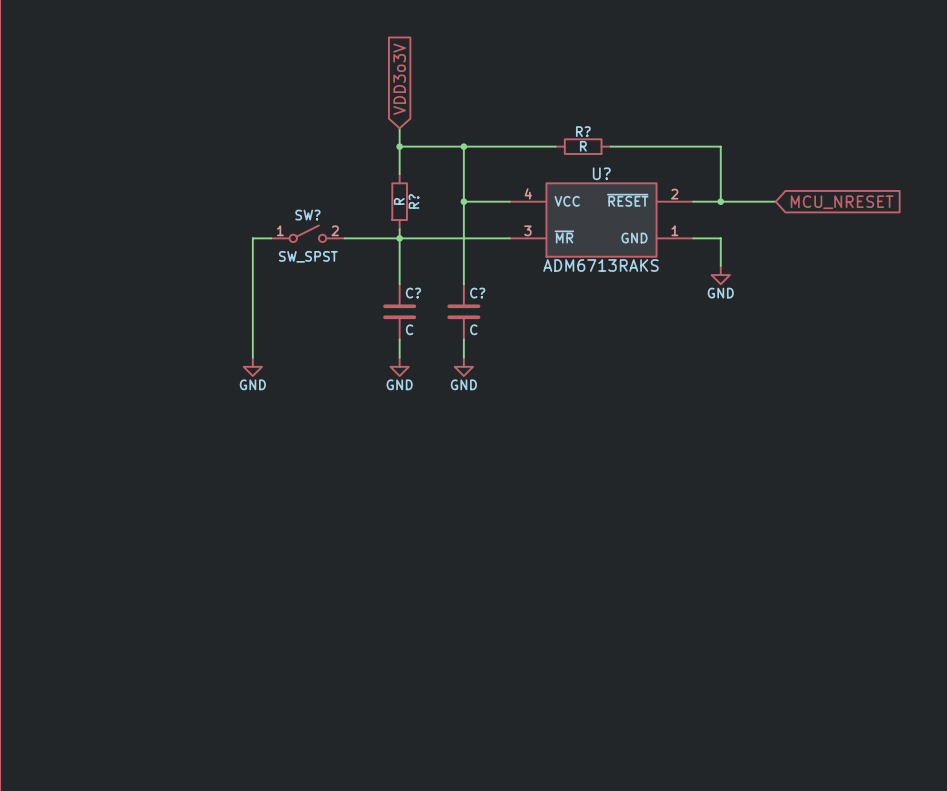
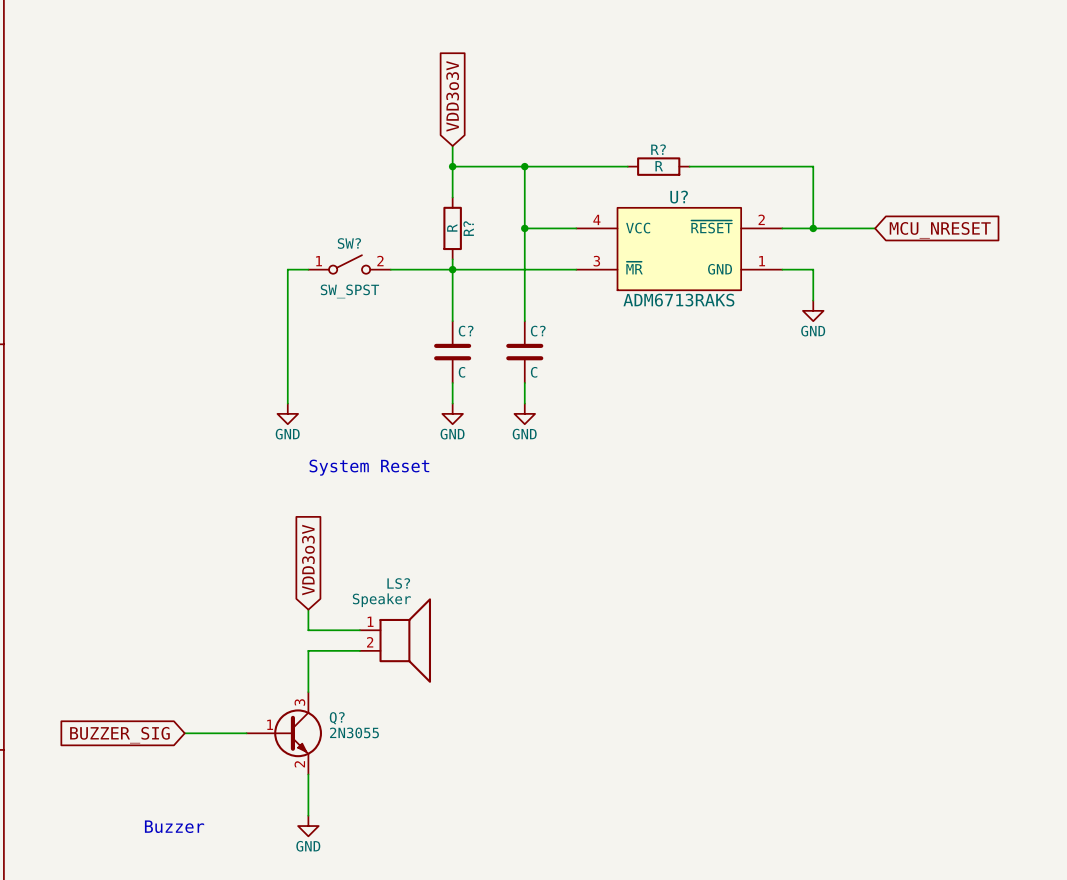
text: none -> System Reset (369, 467)
global label: none -> VDD3o3V (308, 560)
wire: none -> (308, 609) (308, 630) (359, 630)
LS?: none -> Speaker (395, 640)
wire: none -> (359, 650) (308, 650) (308, 692)
global label: none -> BUZZER_SIG (119, 735)
wire: none -> (184, 733) (246, 733)
Q?: none -> 2N3055 (284, 733)
wire: none -> (308, 774) (308, 815)
power symbol: none -> GND (308, 826)
text: none -> Buzzer (174, 826)

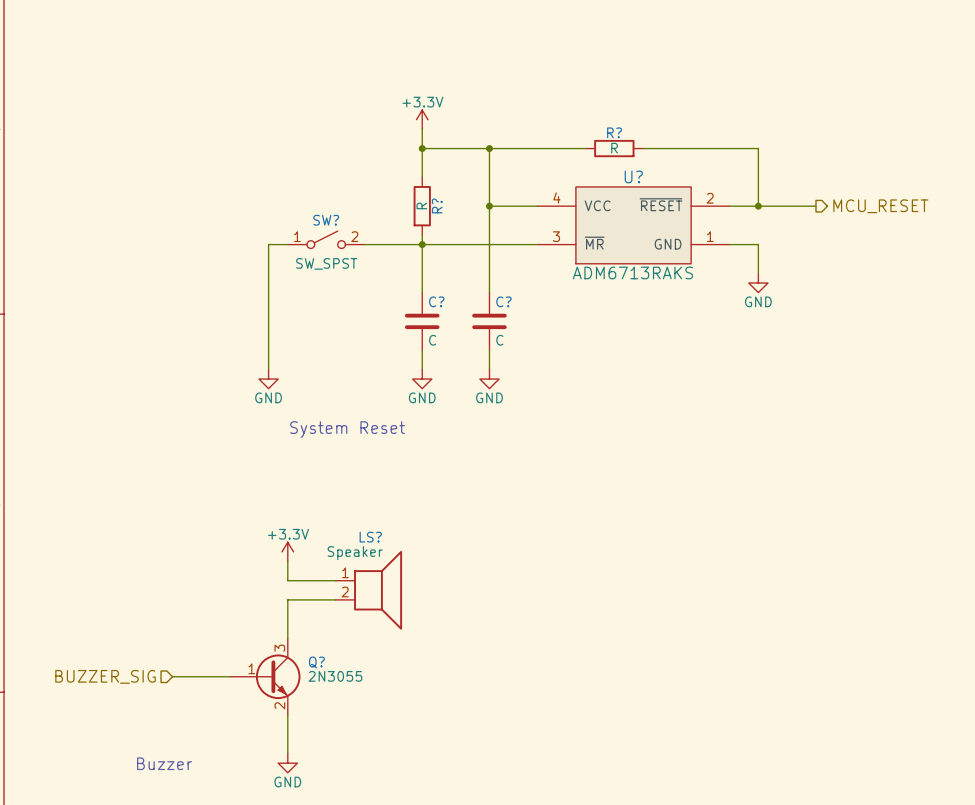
global label: VDD3o3V (452, 96) -> none
power symbol: none -> +3.3V (422, 119)
hierarchical label: none -> MCU_RESET (880, 206)
global label: MCU_NRESET (940, 230) -> none
global label: VDD3o3V (308, 560) -> none
power symbol: none -> +3.3V (287, 551)
hierarchical label: none -> BUZZER_SIG (105, 676)
global label: BUZZER_SIG (119, 735) -> none

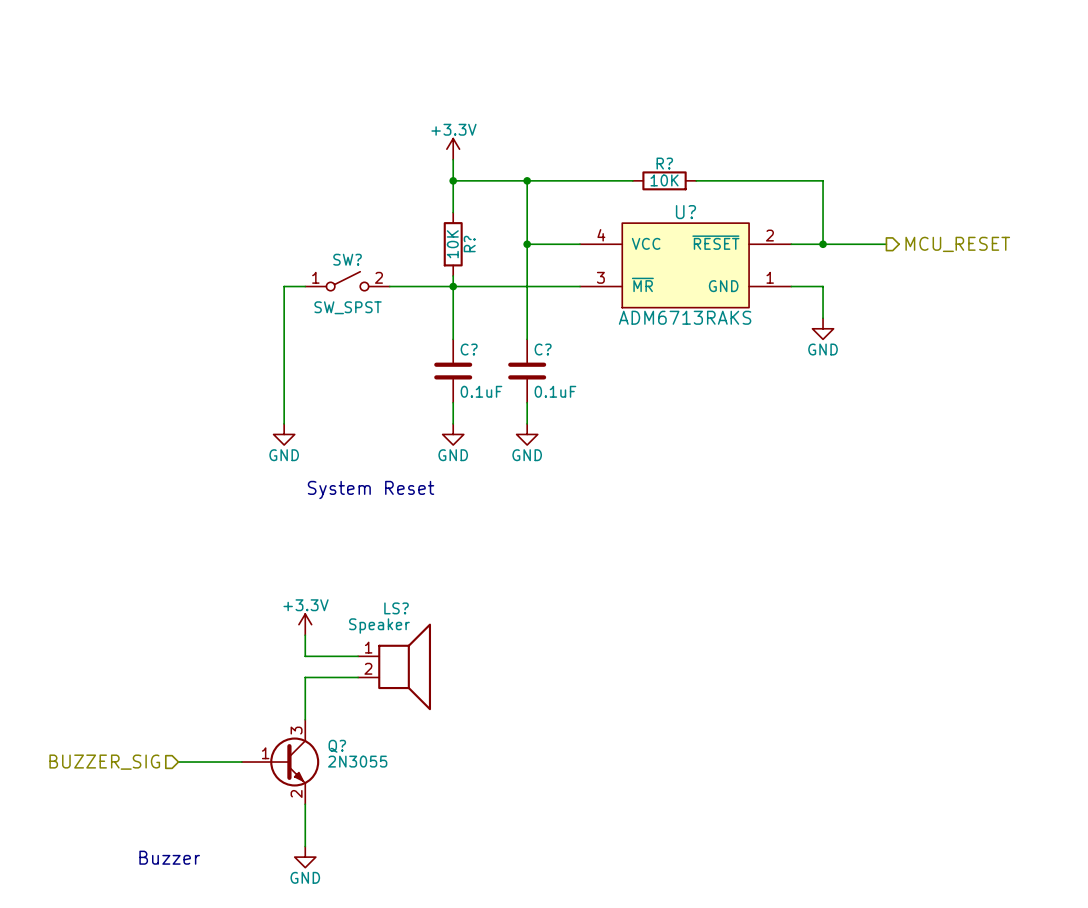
R? value: R (614, 148) -> 10K (664, 180)
R? value: R (421, 205) -> 10K (452, 244)
C? value: C (432, 340) -> 0.1uF (481, 391)
C? value: C (499, 340) -> 0.1uF (555, 391)

